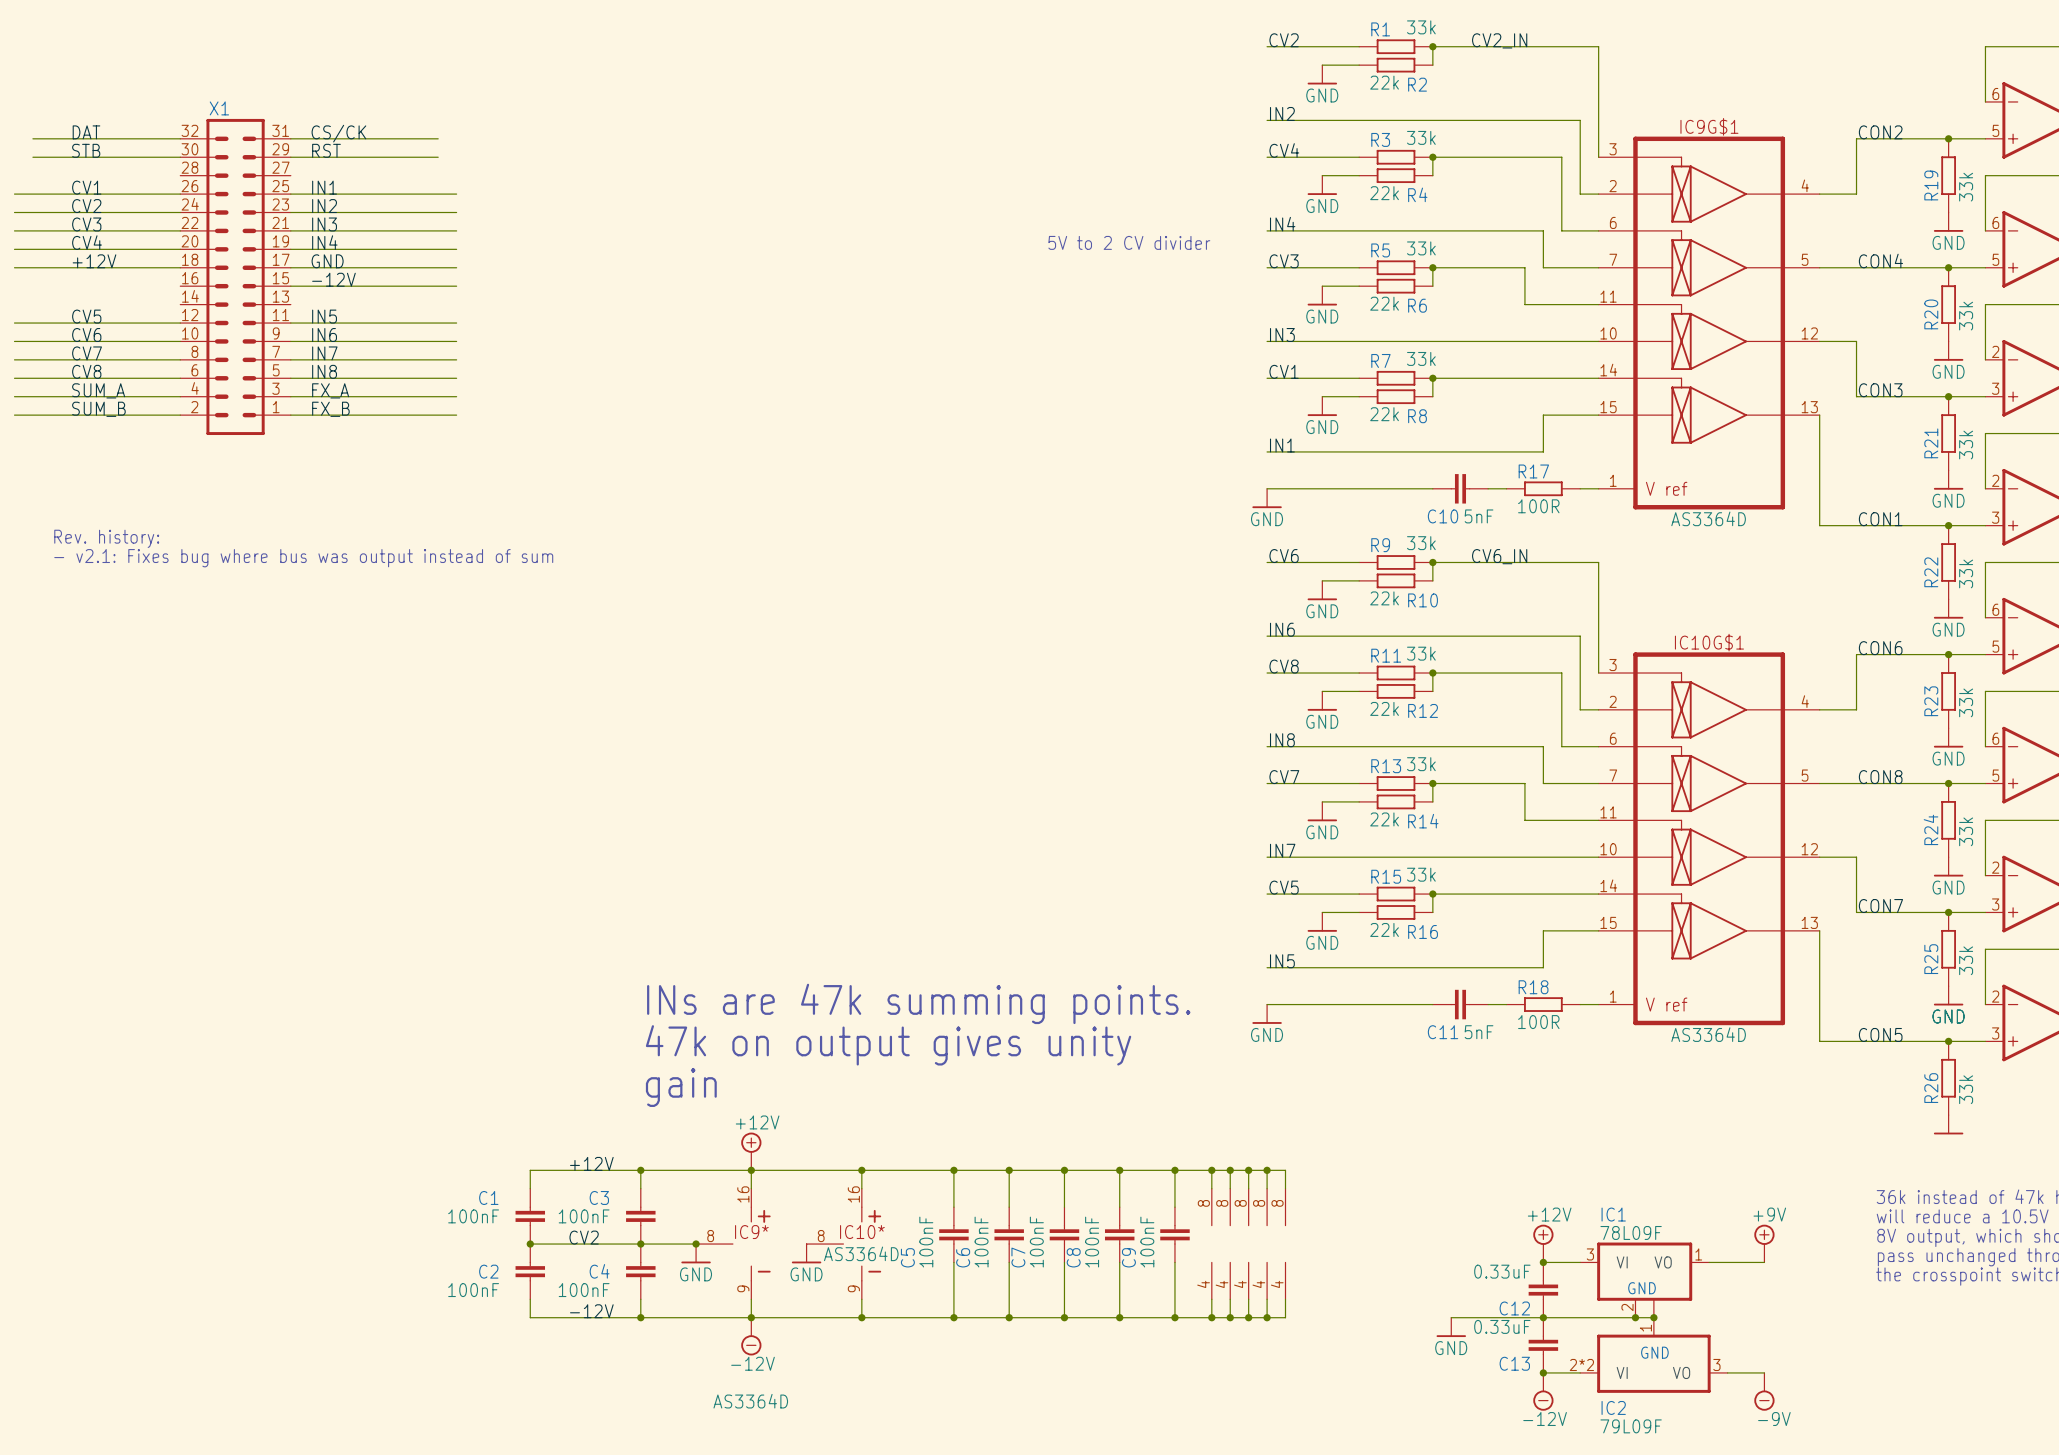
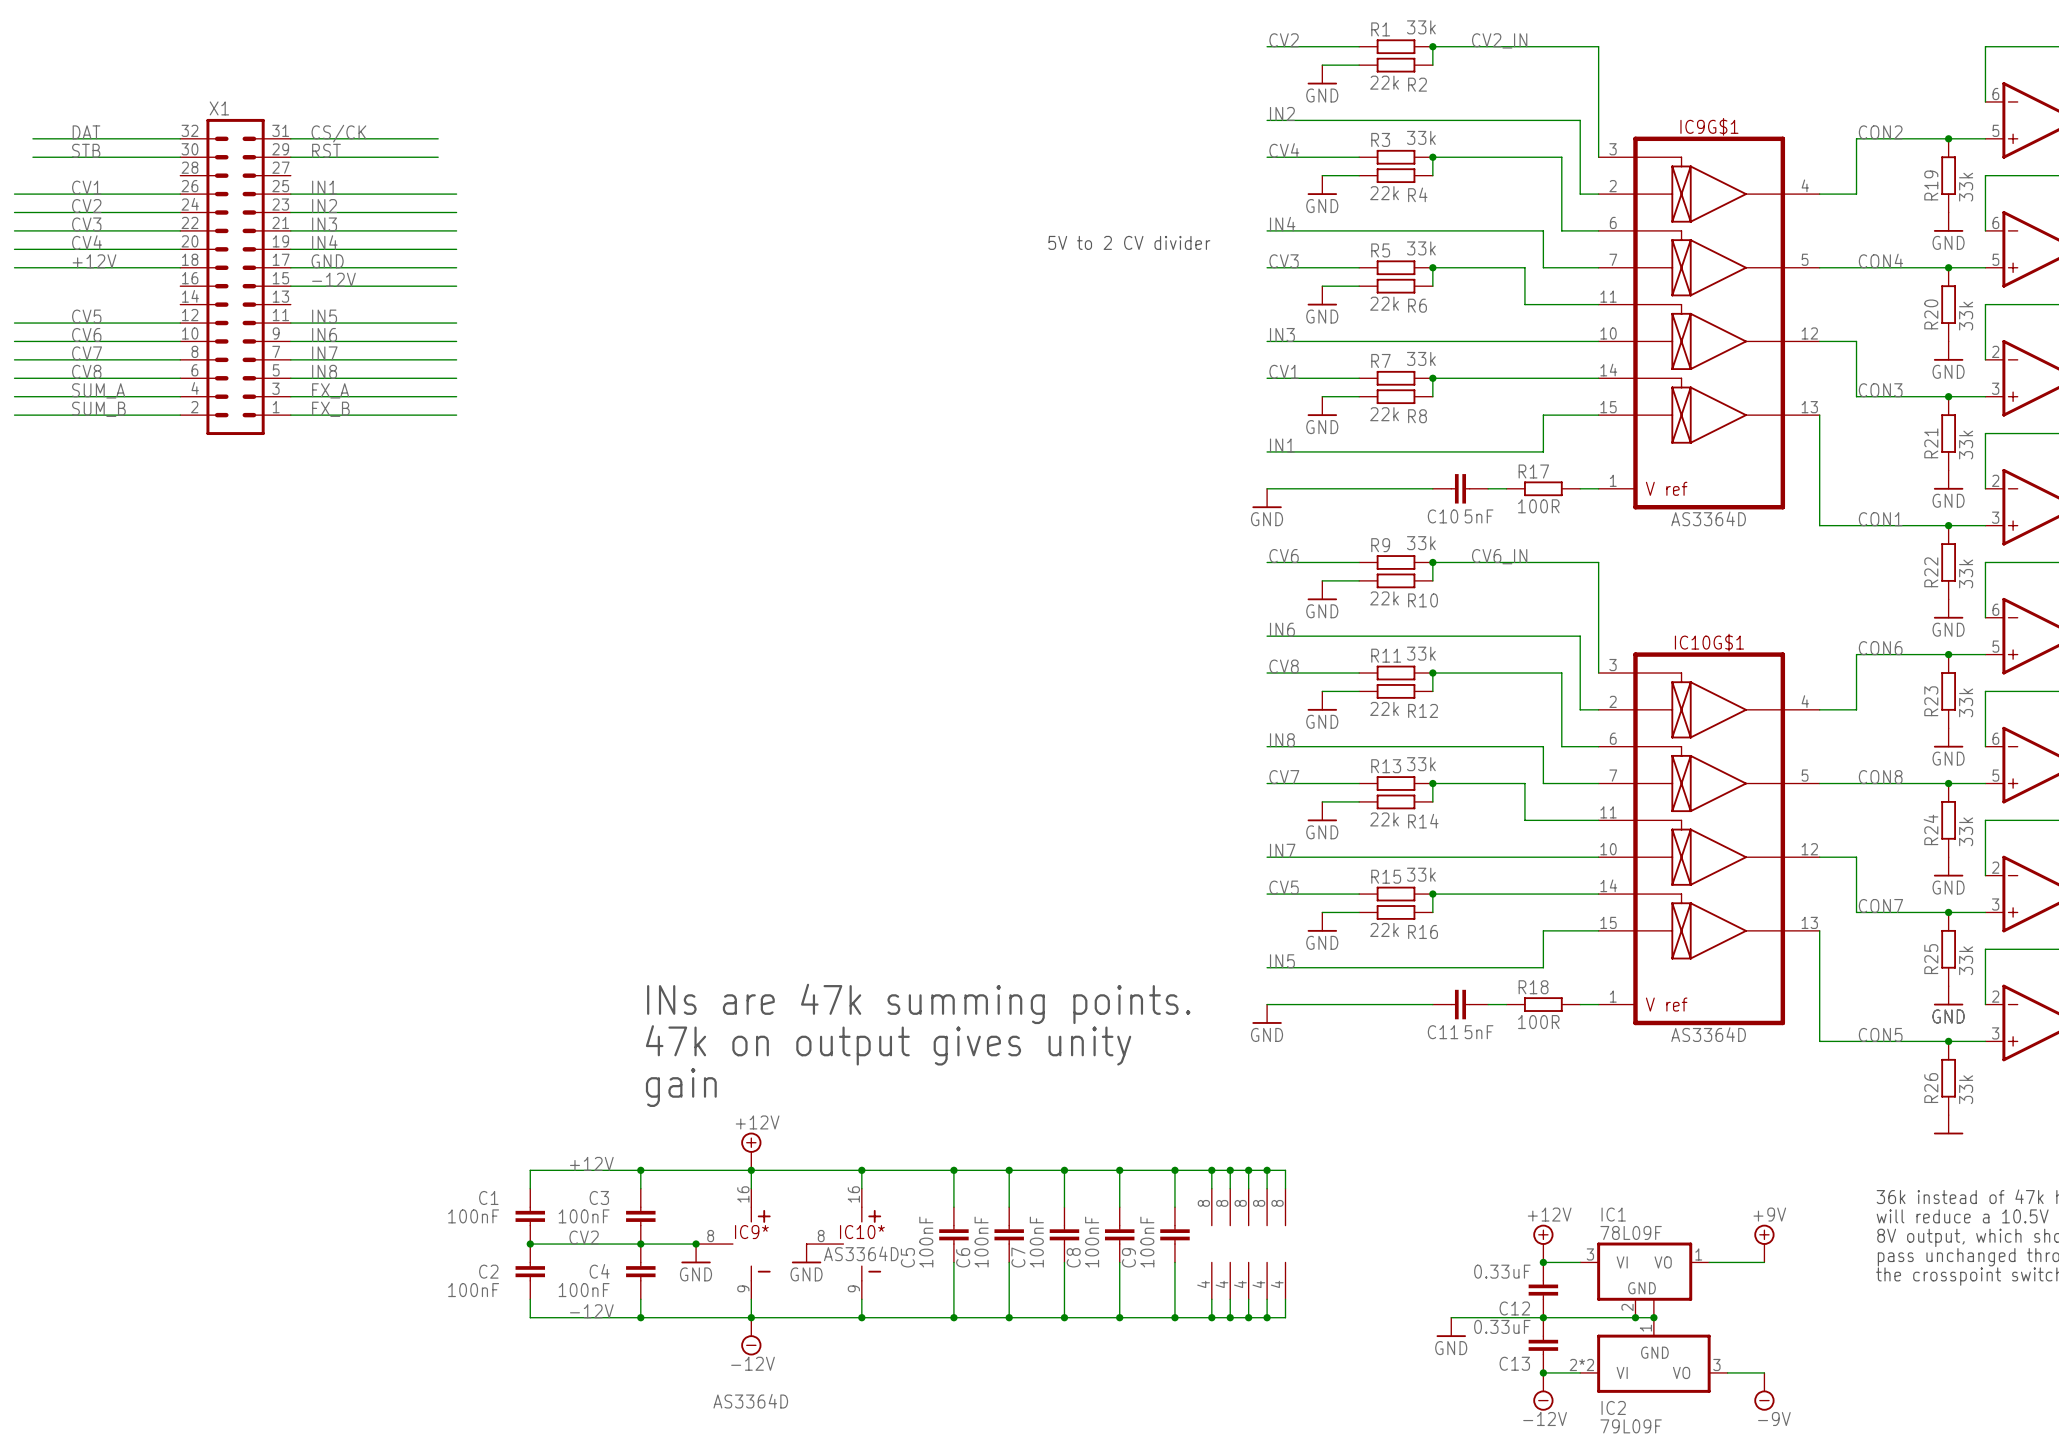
text: Rev. history: (106, 538) -> none
text: - v2.1: Fixes bug where bus was output instead of sum (303, 558) -> none

